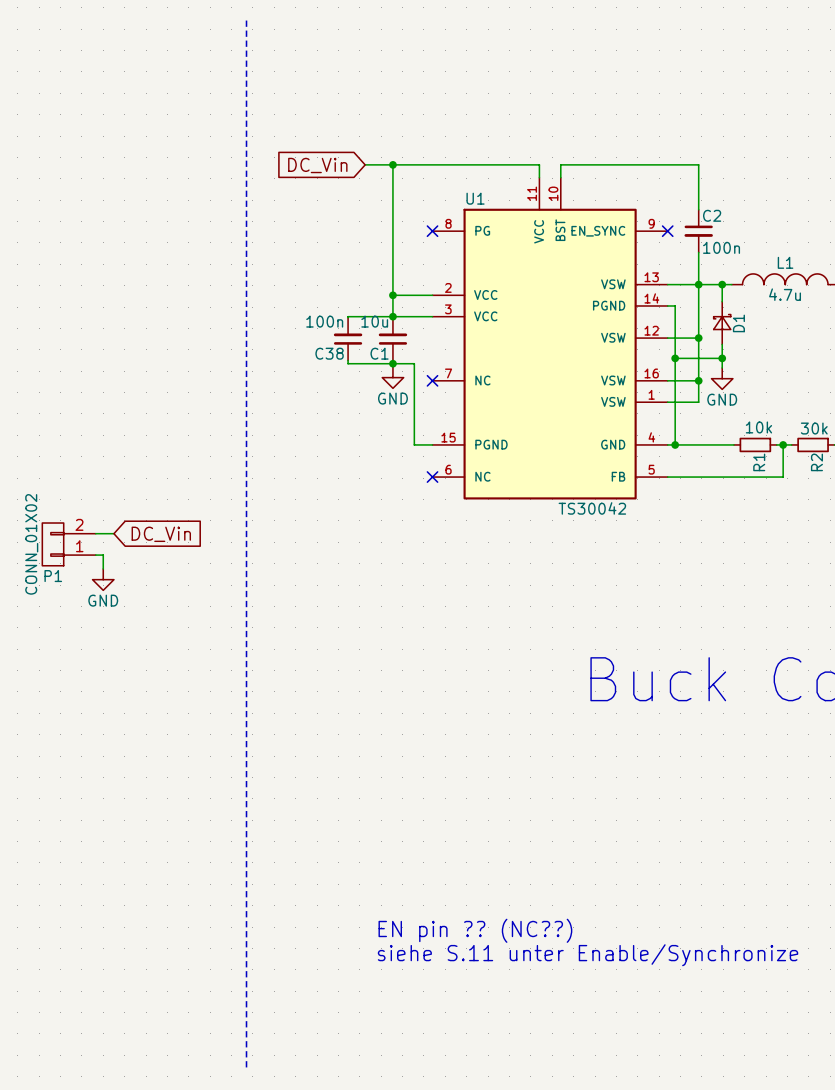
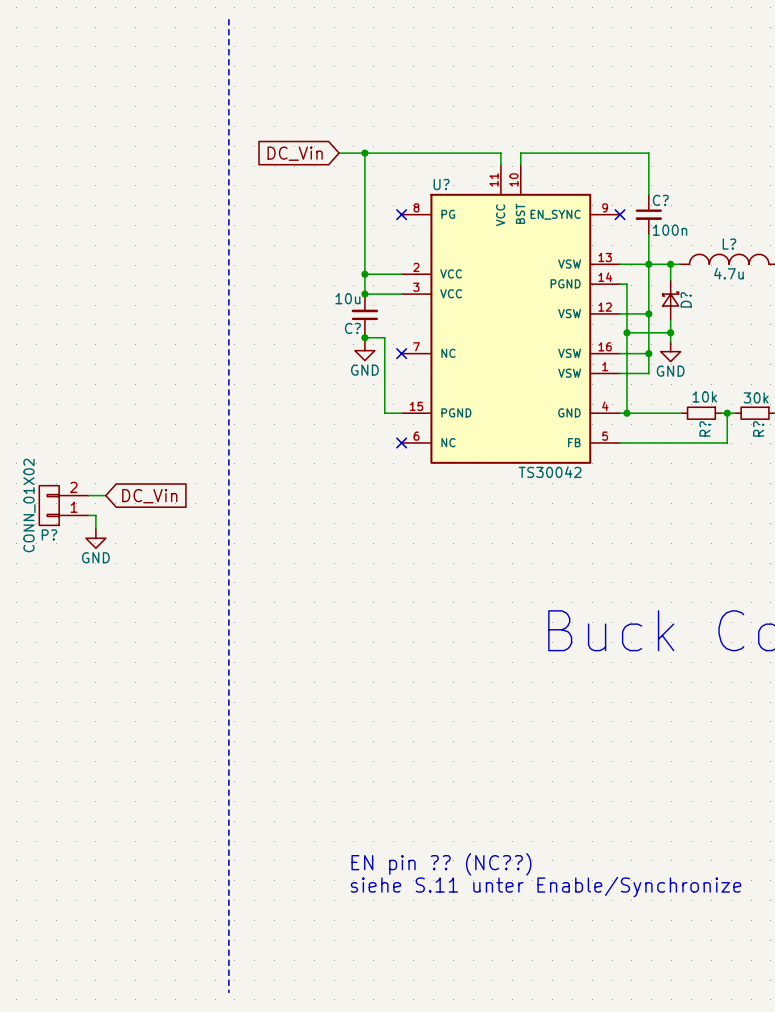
U1 name: U1 (475, 198) -> U? (441, 184)
C2 name: C2 (712, 215) -> C? (660, 200)
L1 name: L1 (785, 262) -> L? (729, 244)
wire: (392, 316) (348, 317) -> none
D1 name: D1 (738, 323) -> D? (686, 299)
C38: 100n (348, 339) -> none
C1 name: C1 (379, 353) -> C? (352, 328)
wire: (348, 360) (348, 363) (392, 363) -> none
R1 name: R1 (759, 462) -> R? (705, 428)
R2 name: R2 (816, 462) -> R? (758, 428)
P1 name: P1 (53, 576) -> P? (49, 534)

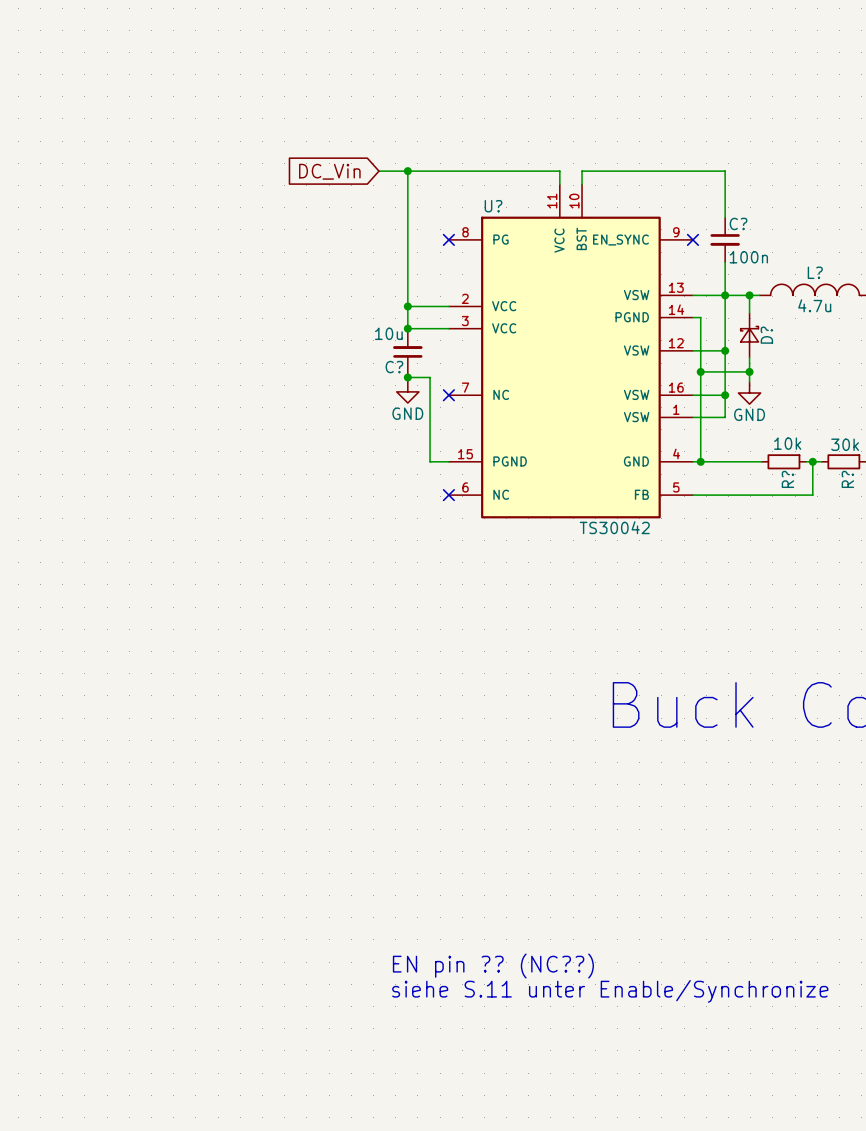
line: (228, 19) (228, 992) -> none
wire: (88, 495) (105, 495) -> none
global label: DC_Vin (149, 496) -> none
P?: CONN_01X02 (64, 505) -> none
wire: (88, 515) (95, 515) (95, 528) -> none
power symbol: GND (95, 538) -> none

